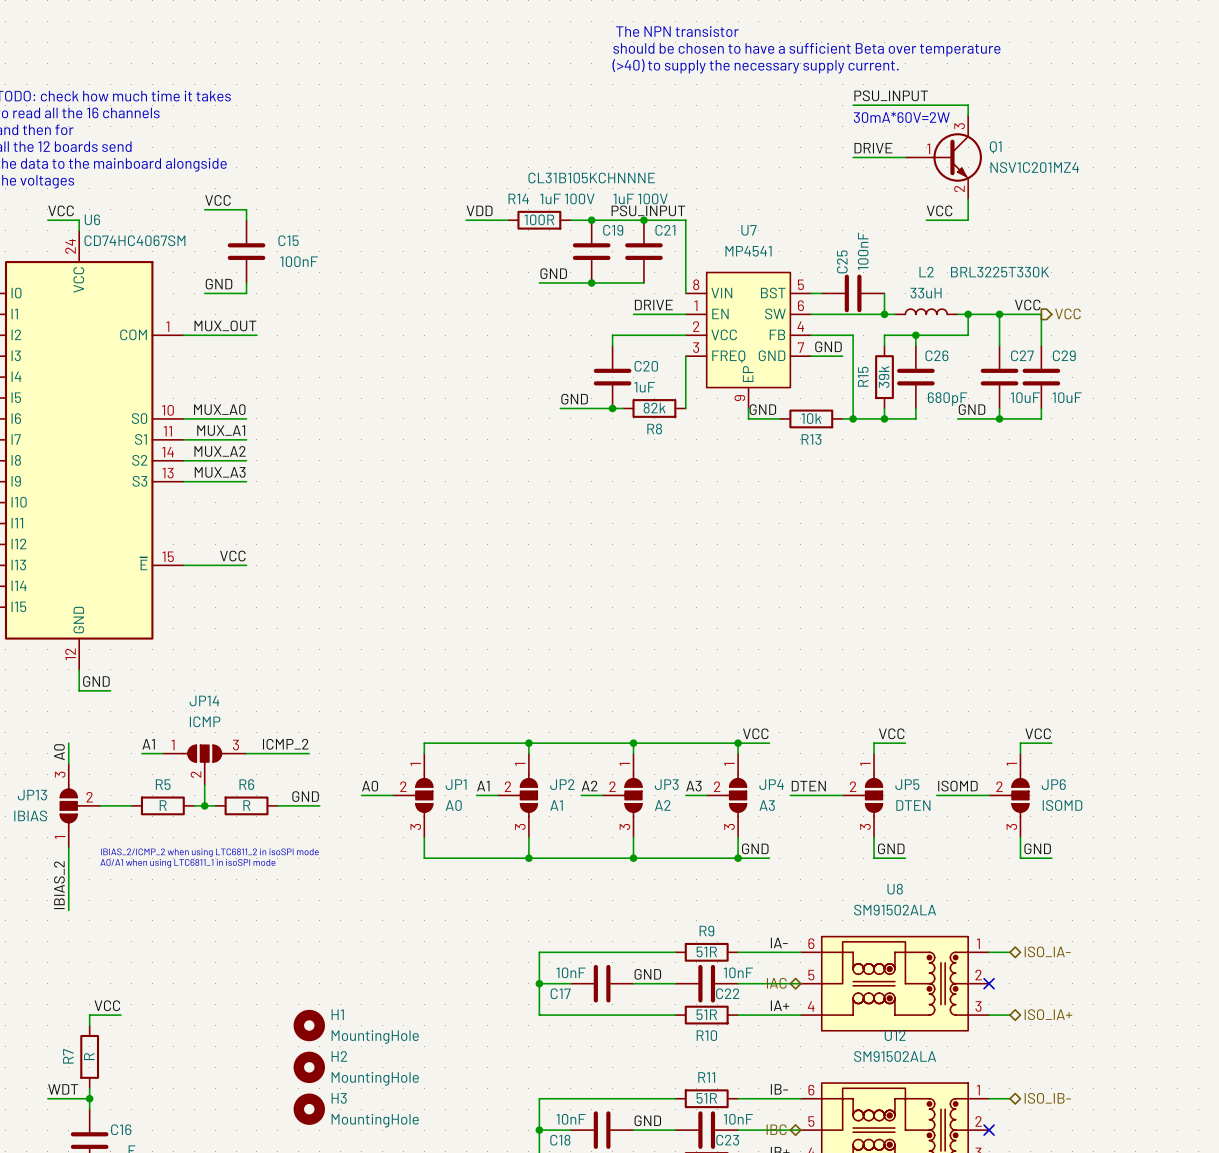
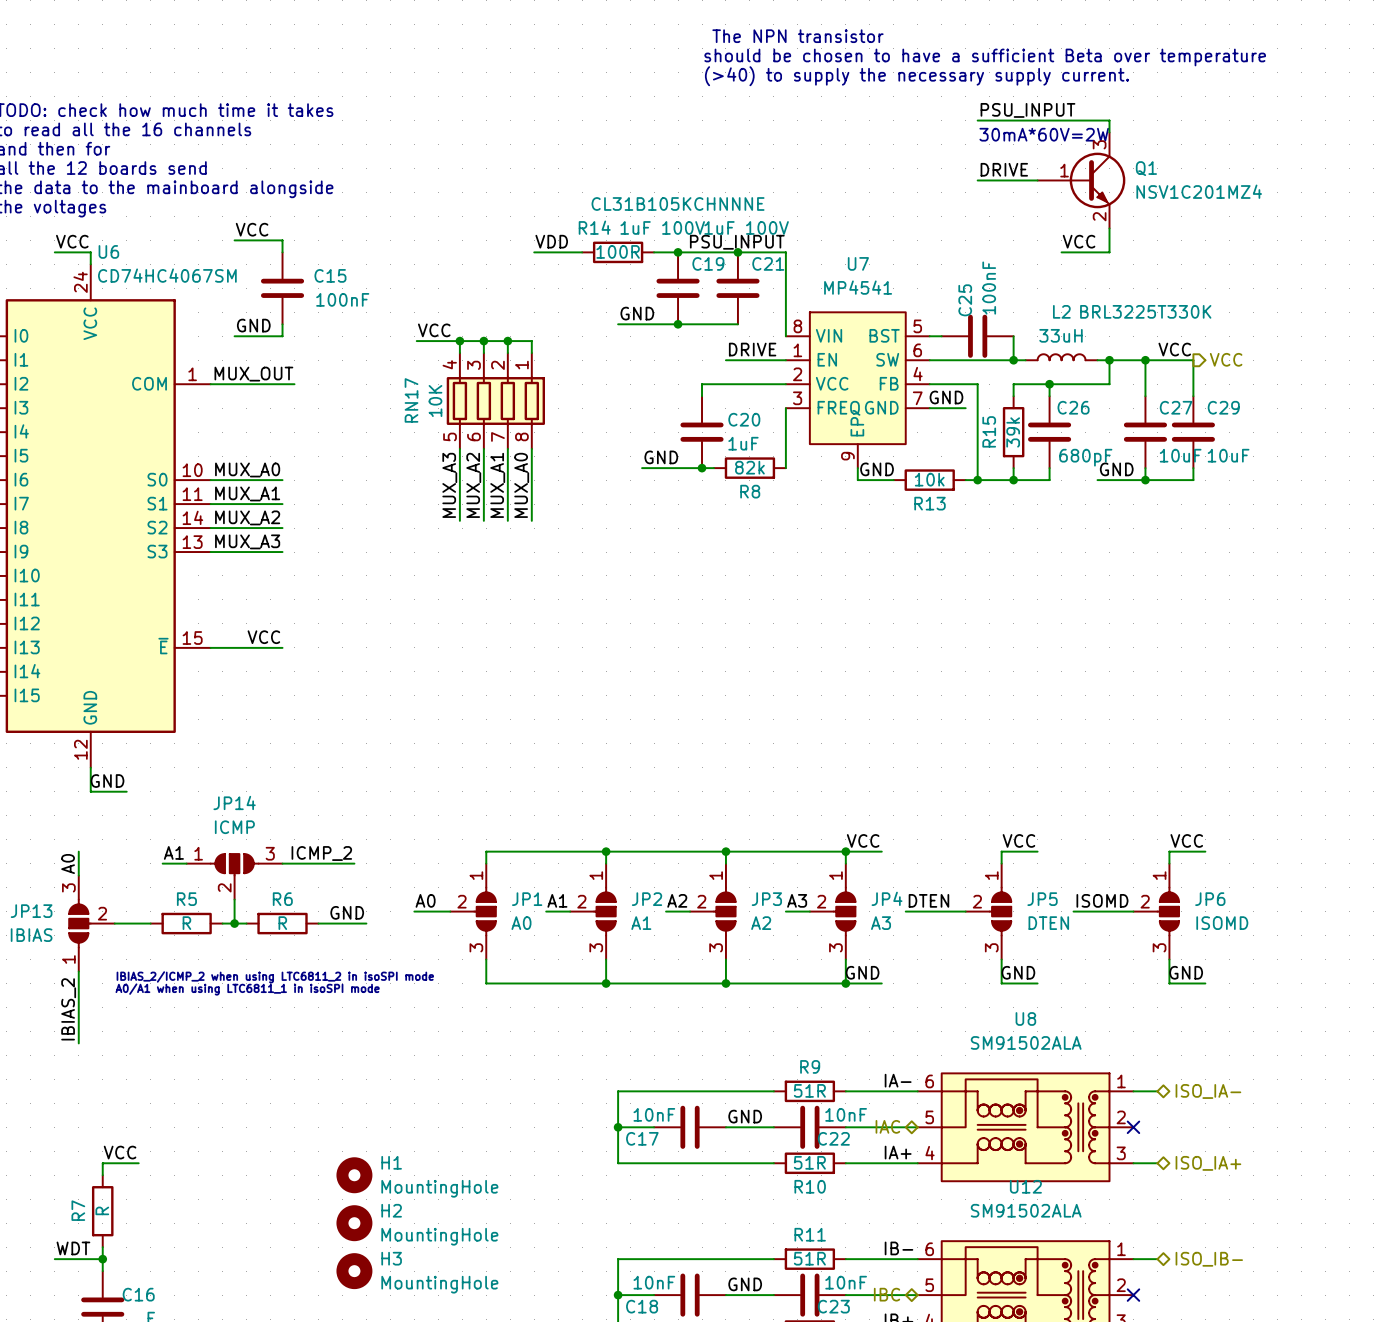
label: none -> VCC (434, 330)
wire: none -> (416, 341) (531, 341) (531, 353)
wire: none -> (459, 341) (459, 353)
junction: none -> (459, 341)
wire: none -> (483, 341) (483, 353)
junction: none -> (483, 341)
wire: none -> (507, 341) (507, 353)
junction: none -> (507, 341)
RN17: none -> 10K (495, 401)
wire: none -> (459, 448) (459, 520)
wire: none -> (483, 448) (483, 520)
wire: none -> (507, 448) (507, 520)
wire: none -> (531, 448) (531, 520)
label: none -> MUX_A3 (449, 485)
label: none -> MUX_A2 (473, 485)
label: none -> MUX_A0 (521, 485)
label: none -> MUX_A1 (497, 485)

